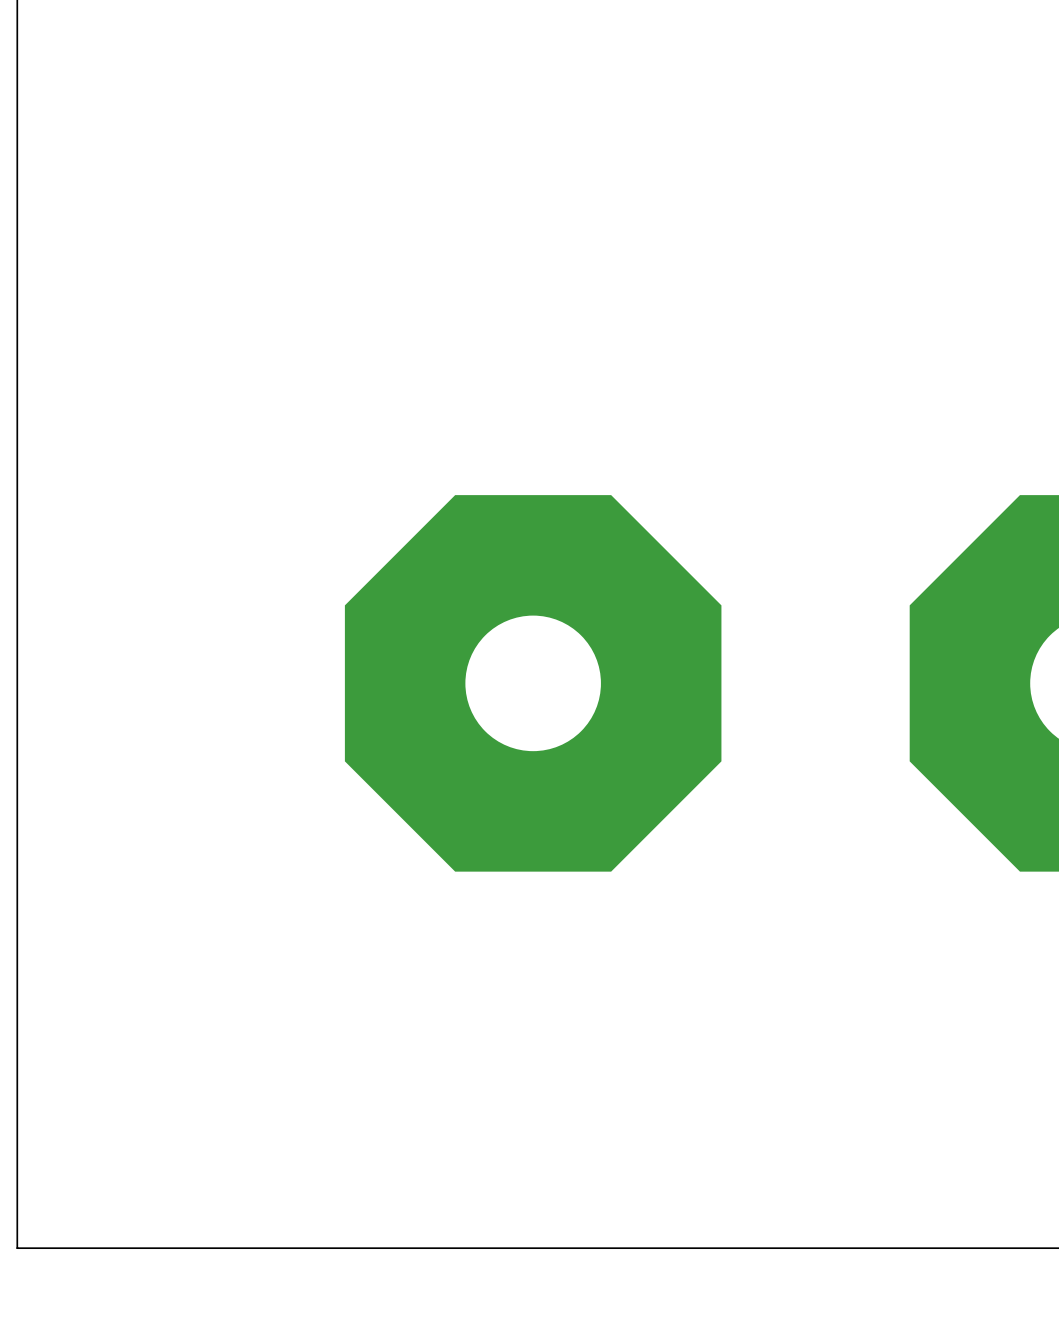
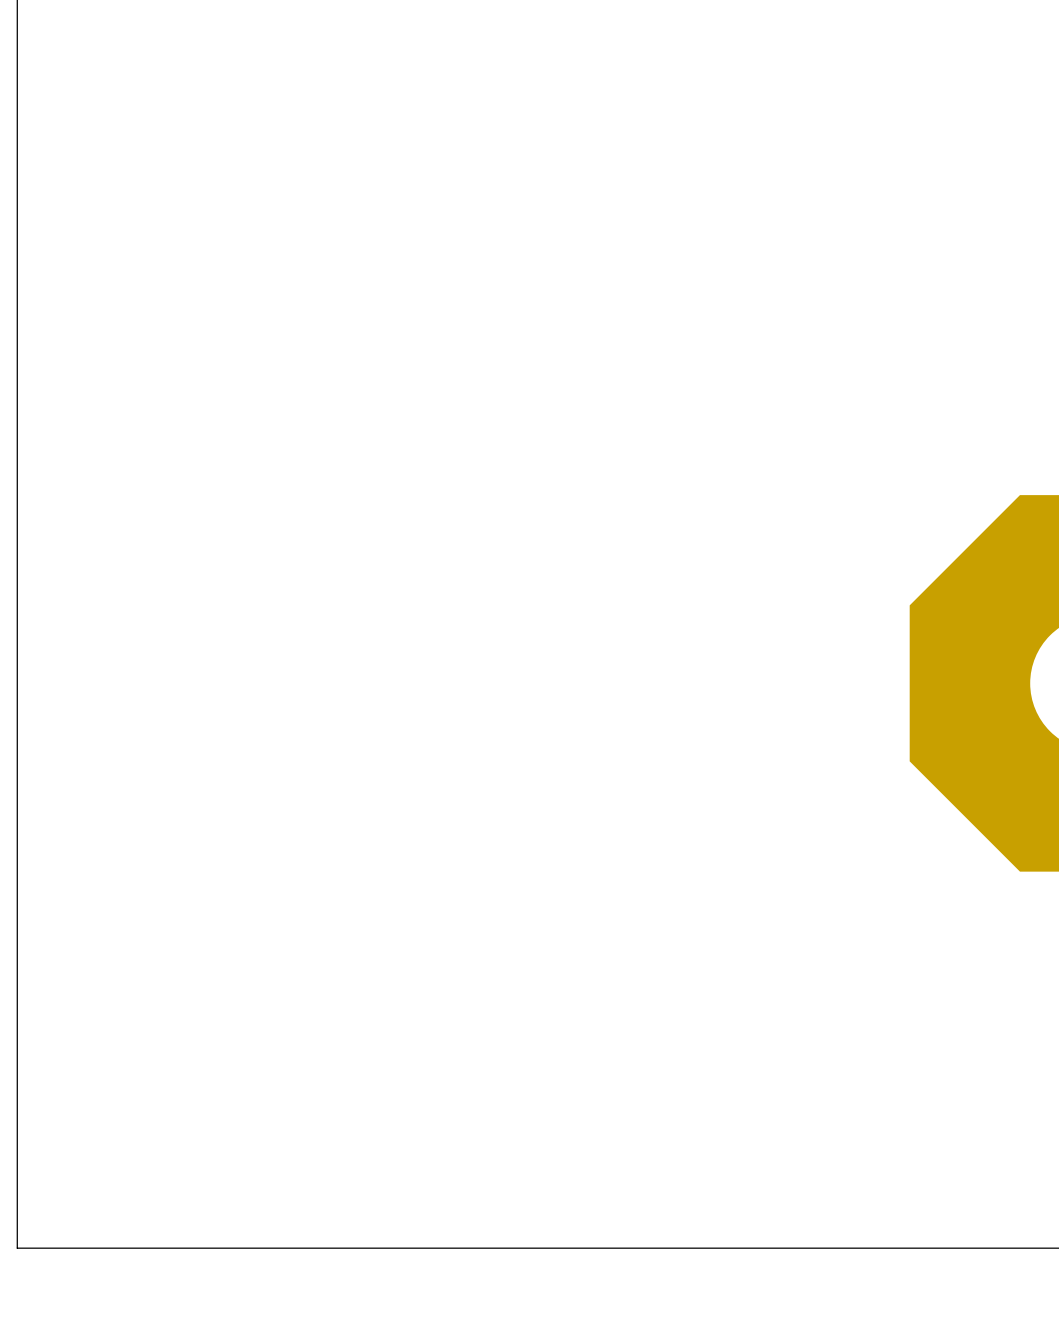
part: (533, 683) -> none

